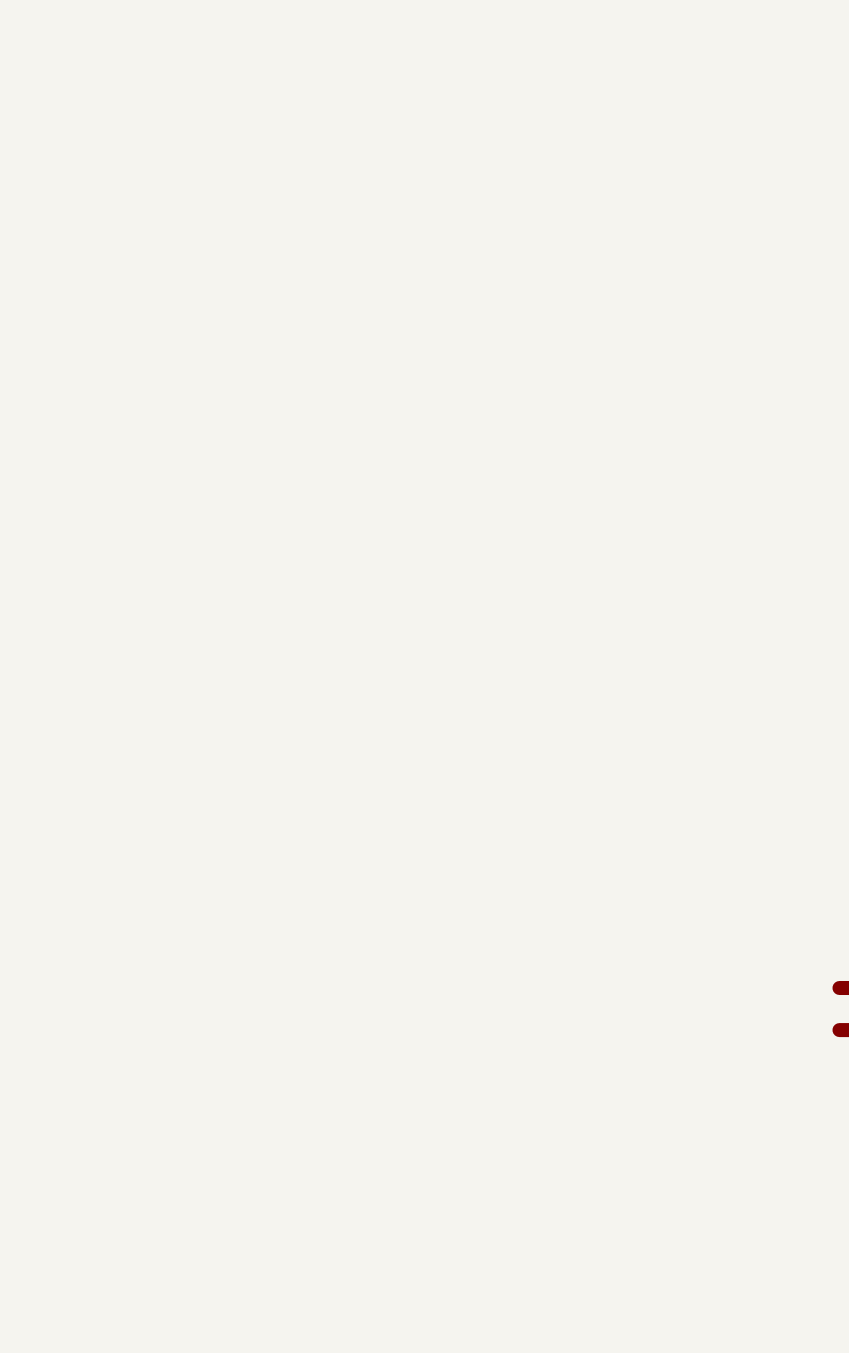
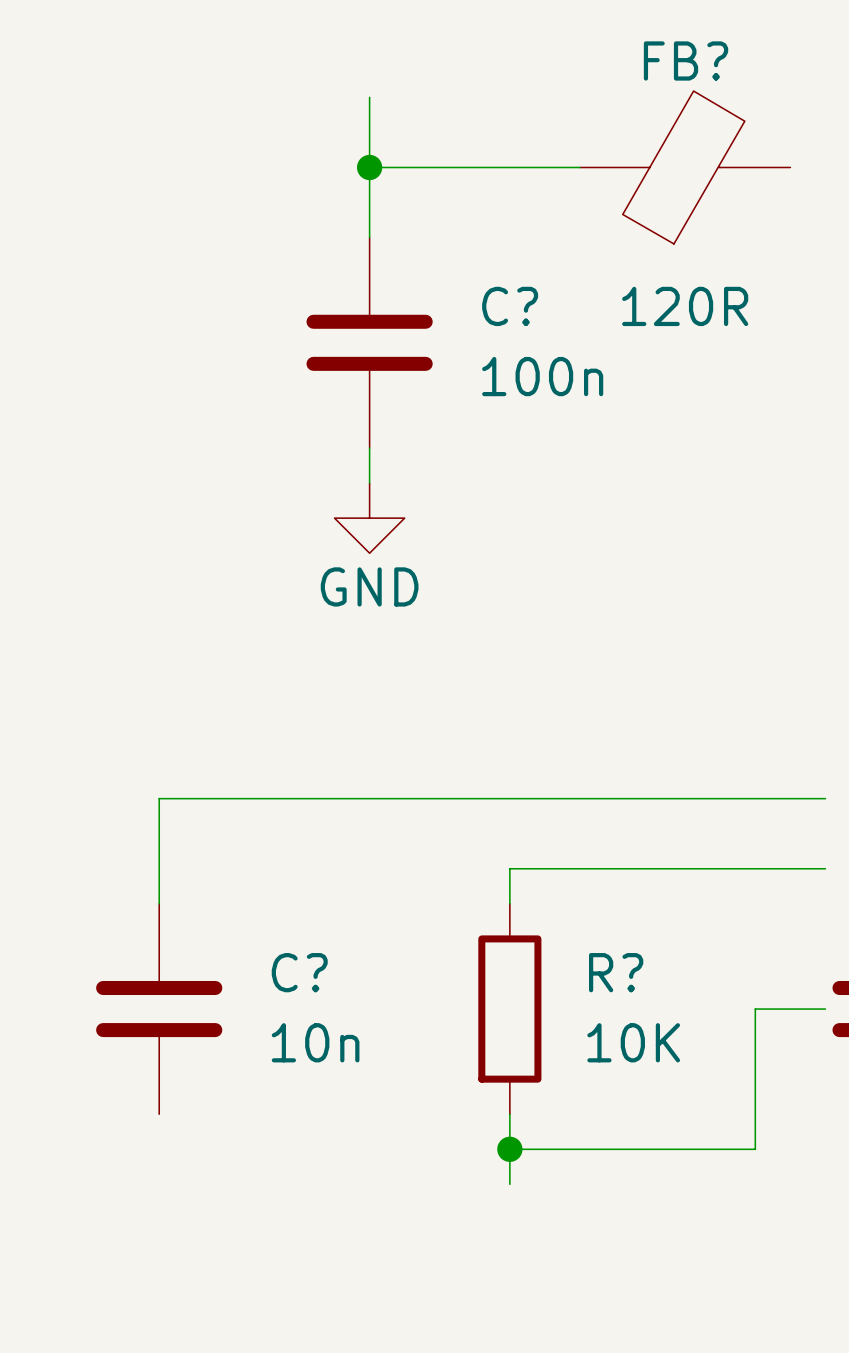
wire: none -> (369, 97) (369, 237)
wire: none -> (369, 167) (579, 167)
junction: none -> (369, 167)
FB?: none -> 120R (685, 167)
C?: none -> 100n (369, 342)
wire: none -> (369, 448) (369, 483)
power symbol: none -> GND (369, 518)
wire: none -> (825, 798) (159, 798) (159, 903)
wire: none -> (825, 868) (509, 868) (509, 903)
C?: none -> 10n (159, 1009)
R?: none -> 10K (509, 1009)
wire: none -> (825, 1009) (755, 1009) (755, 1149) (509, 1149)
wire: none -> (509, 1114) (509, 1184)
junction: none -> (509, 1149)

